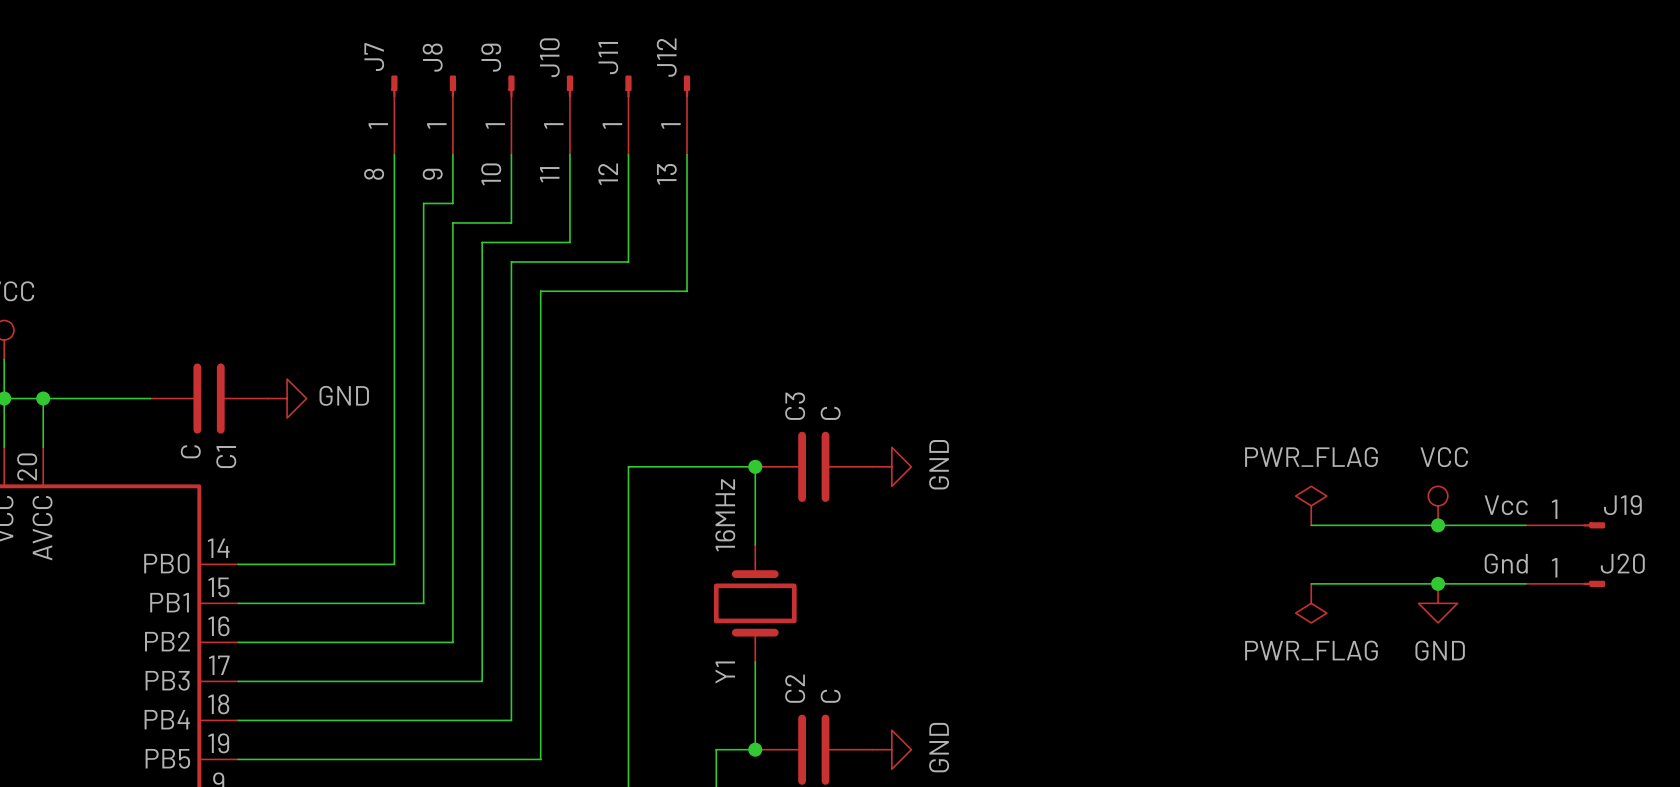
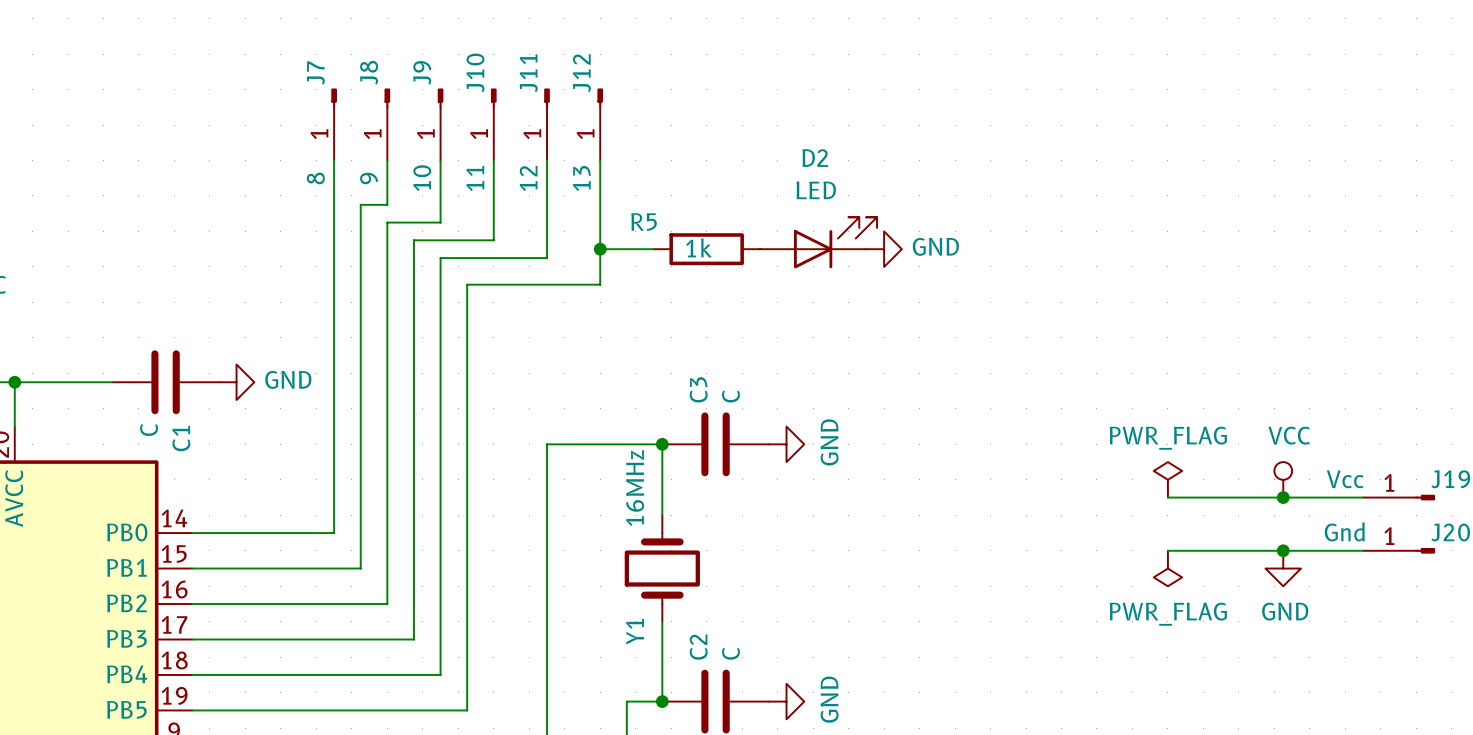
D2: none -> LED (818, 242)
wire: none -> (600, 249) (653, 249)
junction: none -> (600, 249)
R5: none -> 1k (706, 249)
power symbol: none -> GND (884, 249)

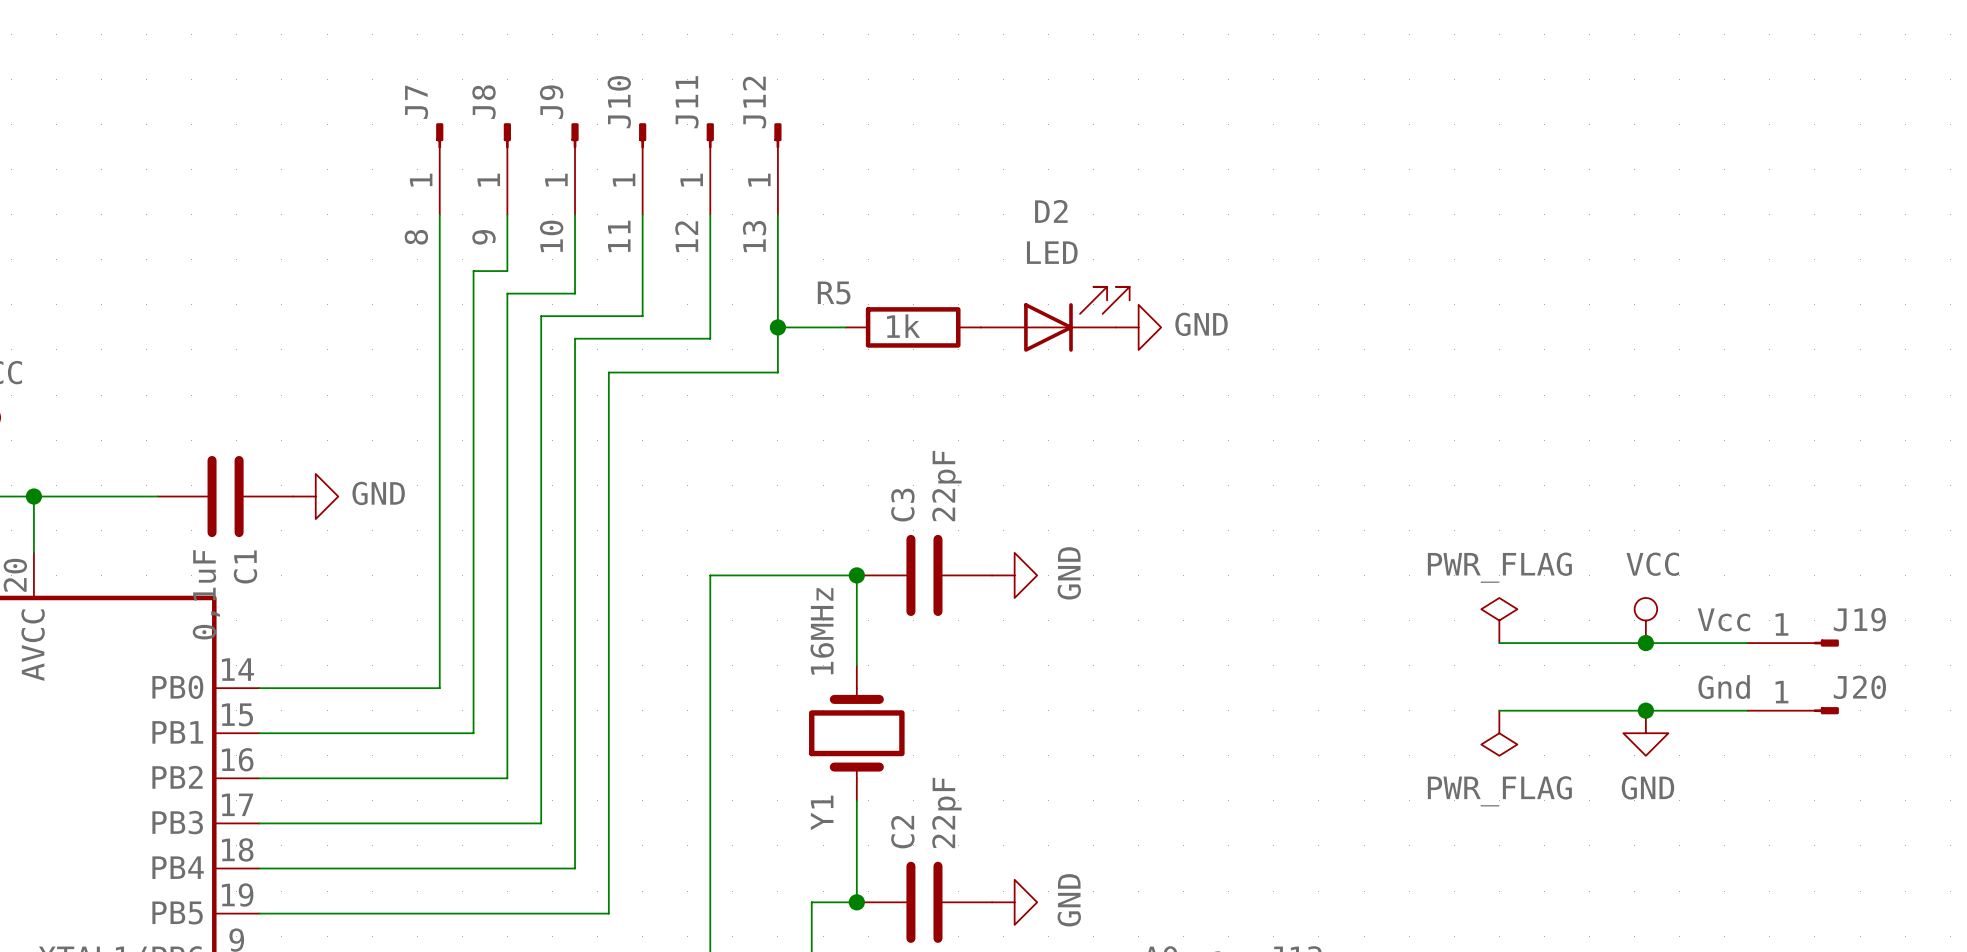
C3 value: C (730, 396) -> 22pF (946, 486)
C1 value: C (149, 429) -> 0,1uF (206, 594)
C2 value: C (730, 653) -> 22pF (946, 813)

